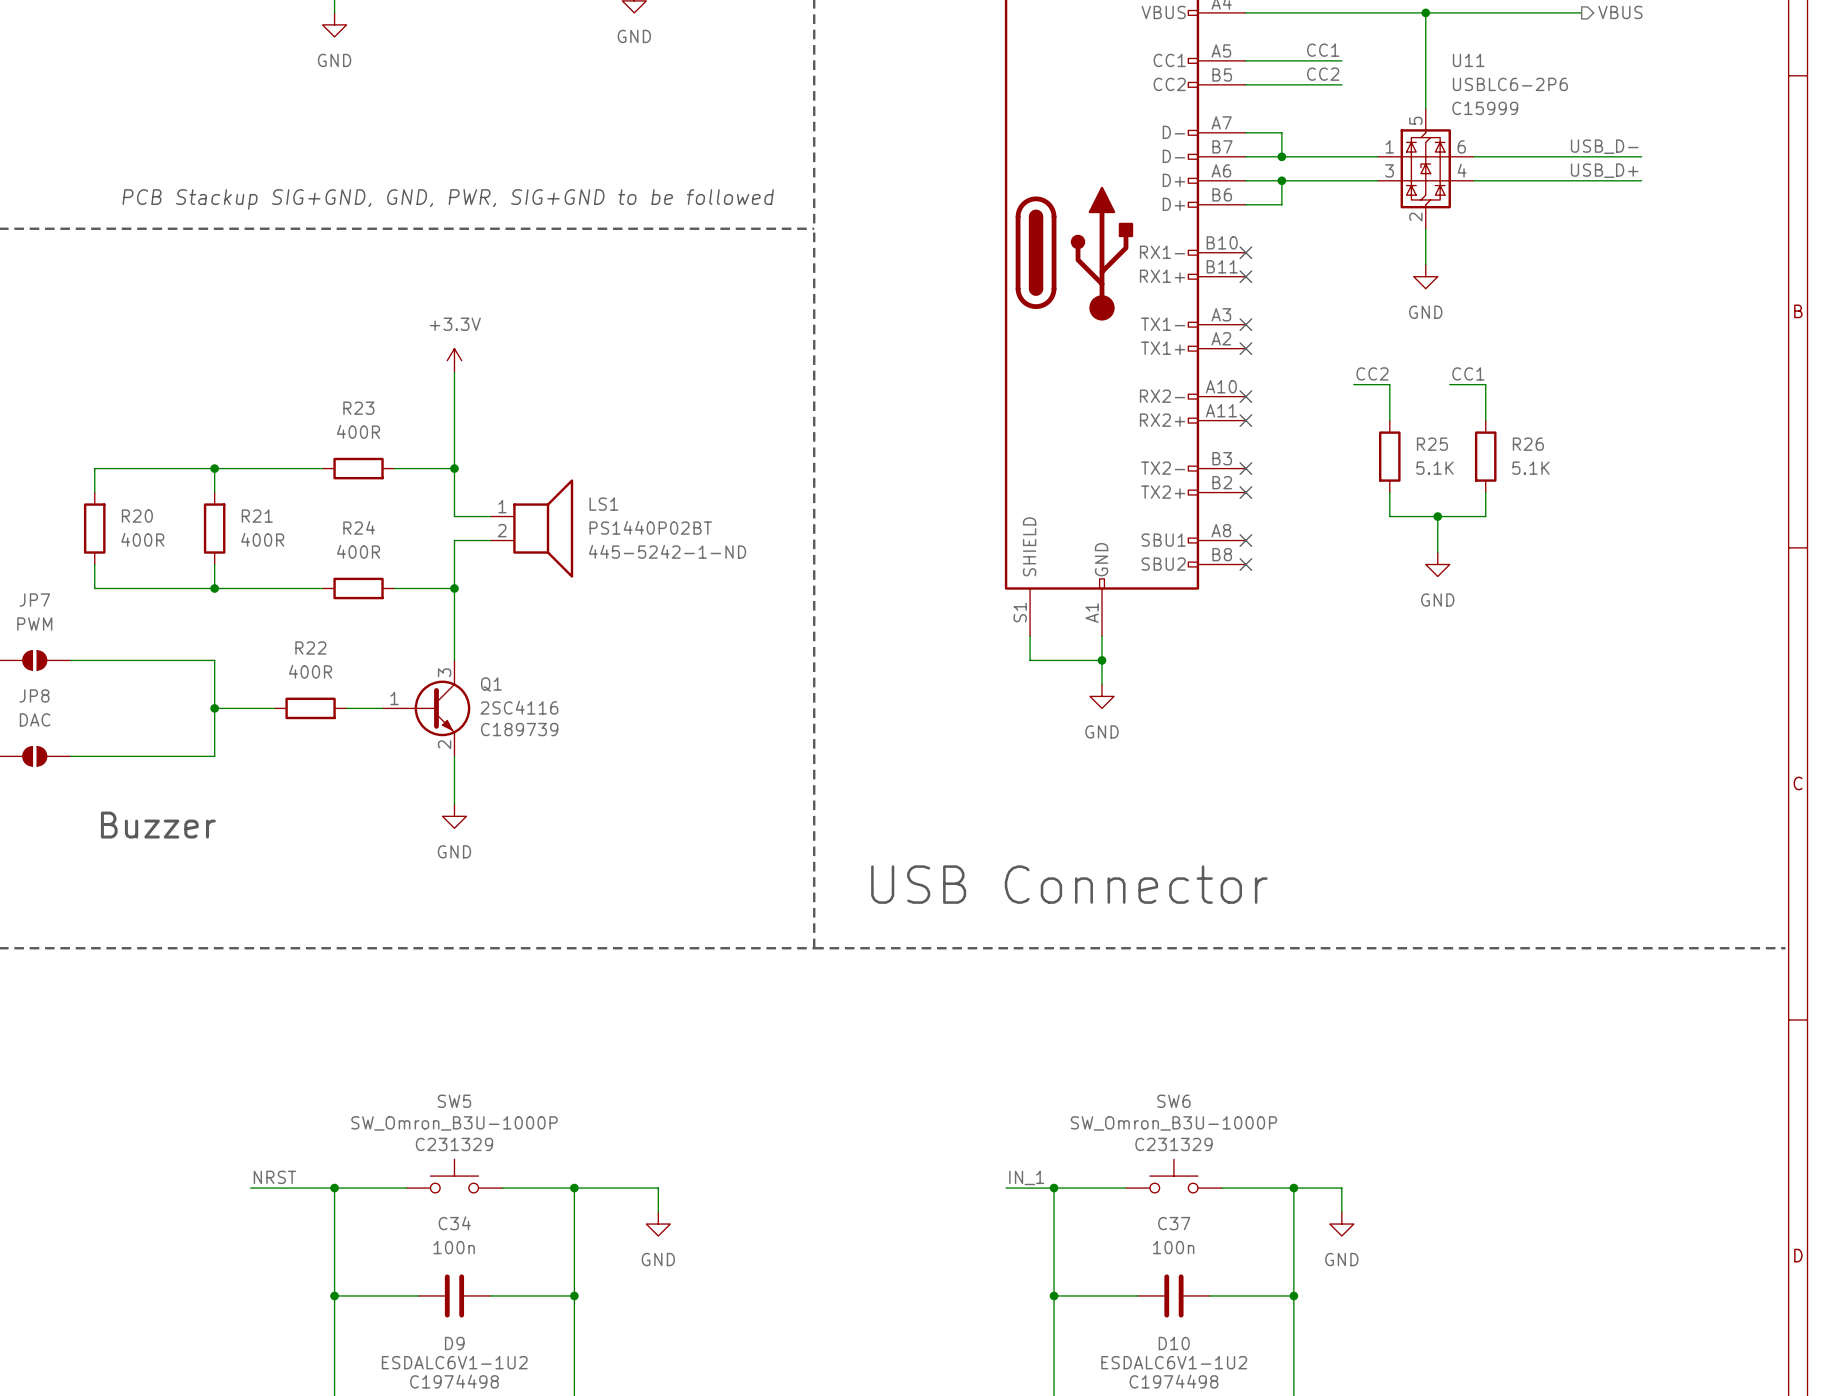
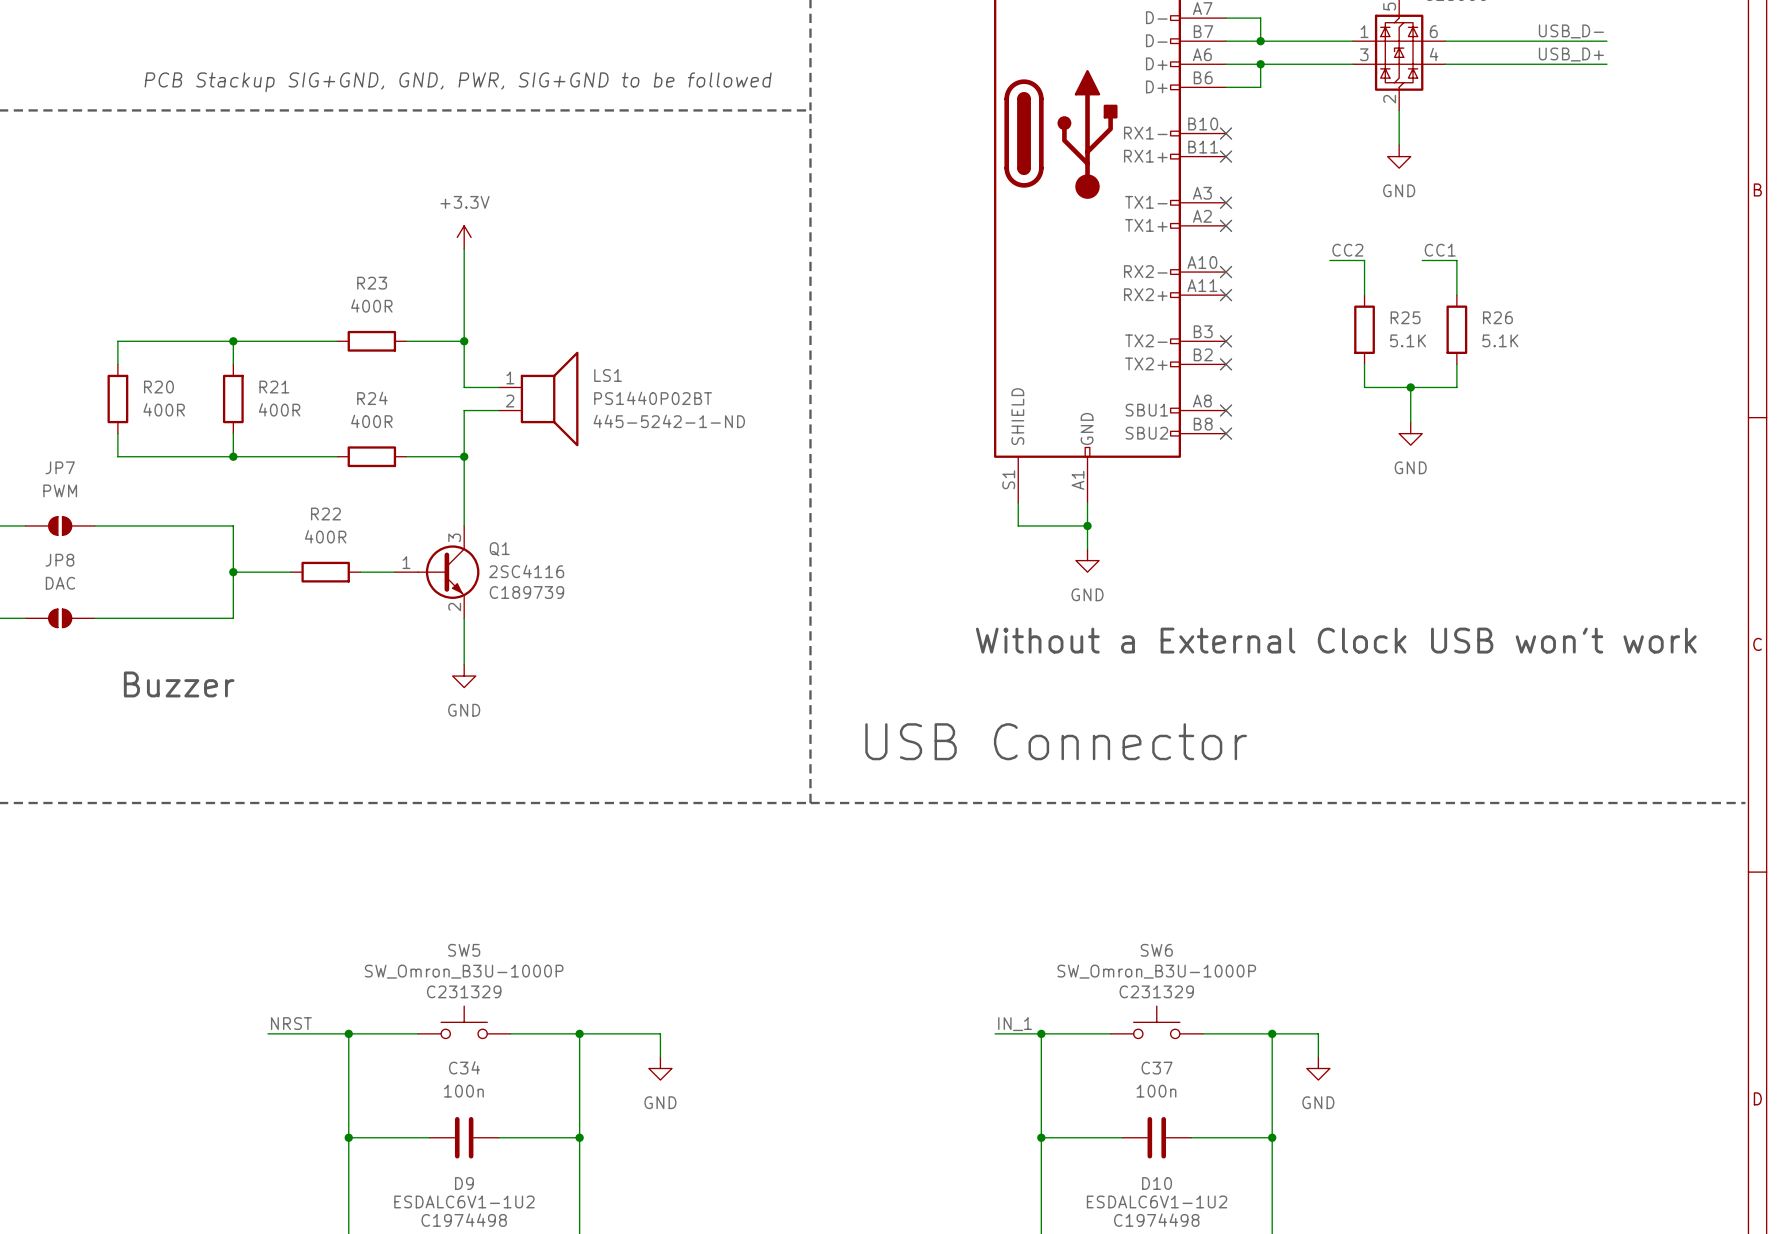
text: none -> Without a External Clock USB won't work (1336, 640)

